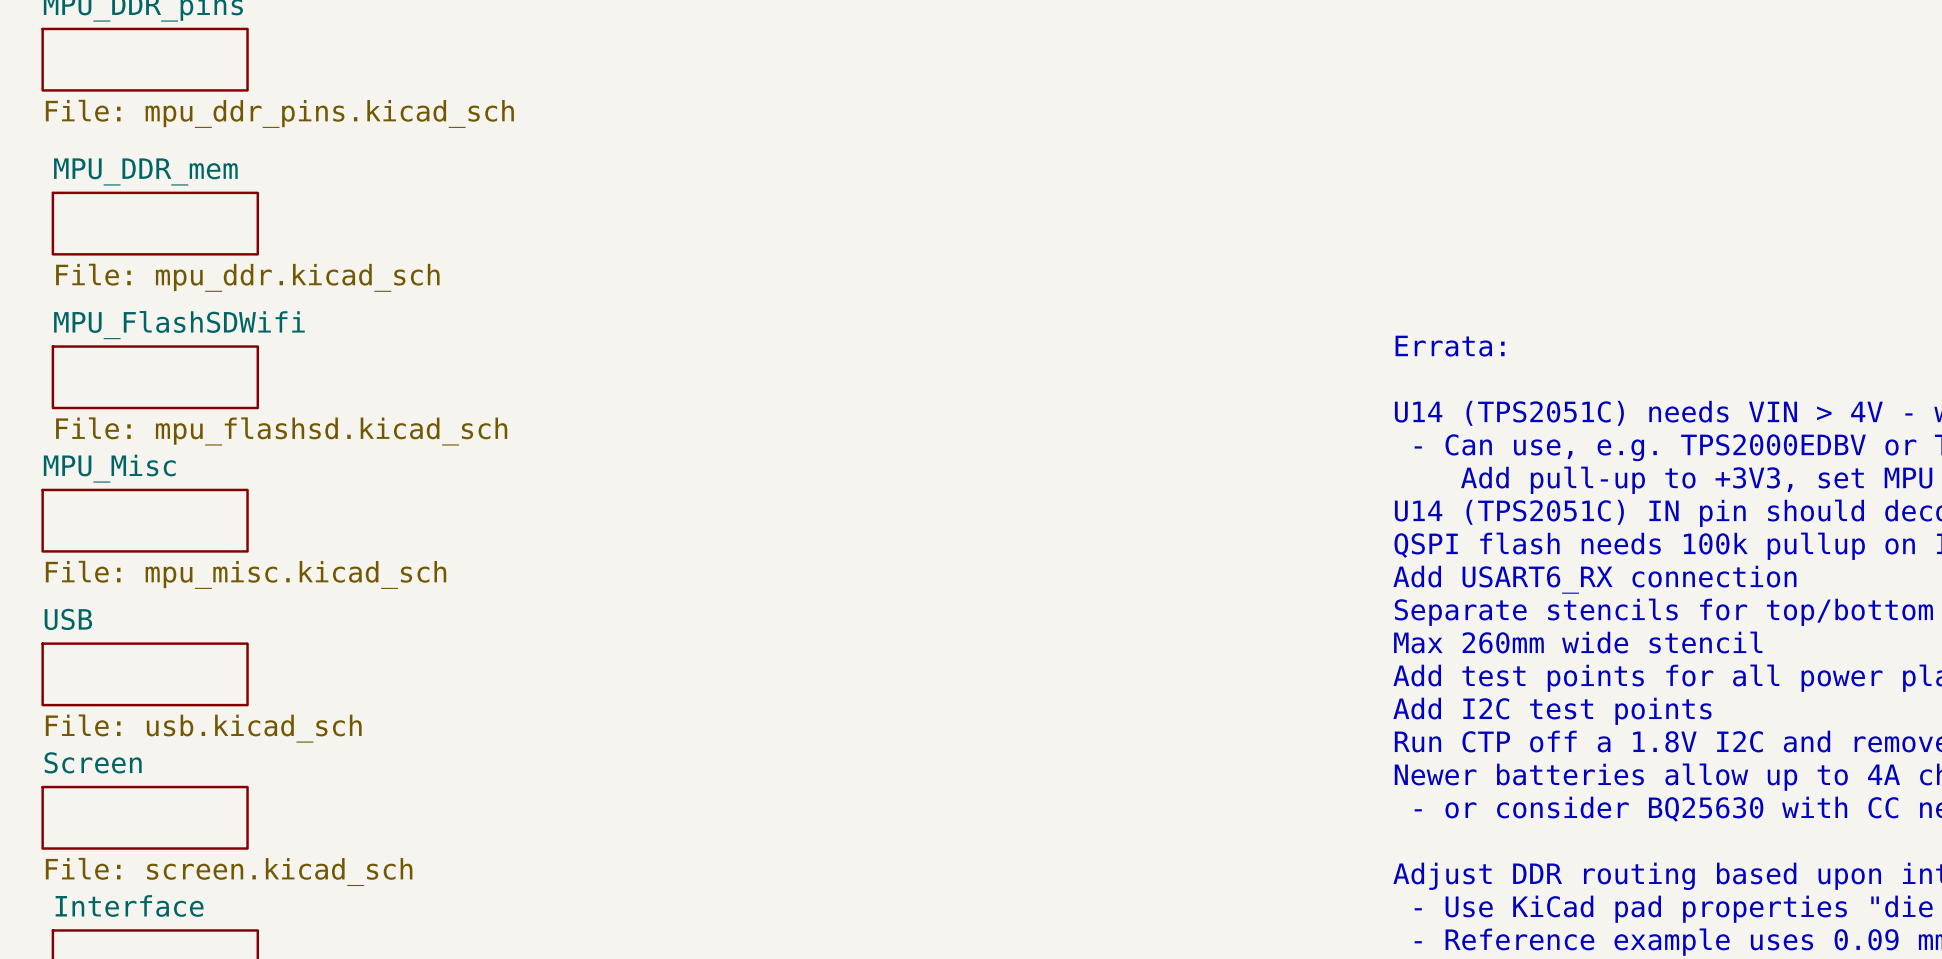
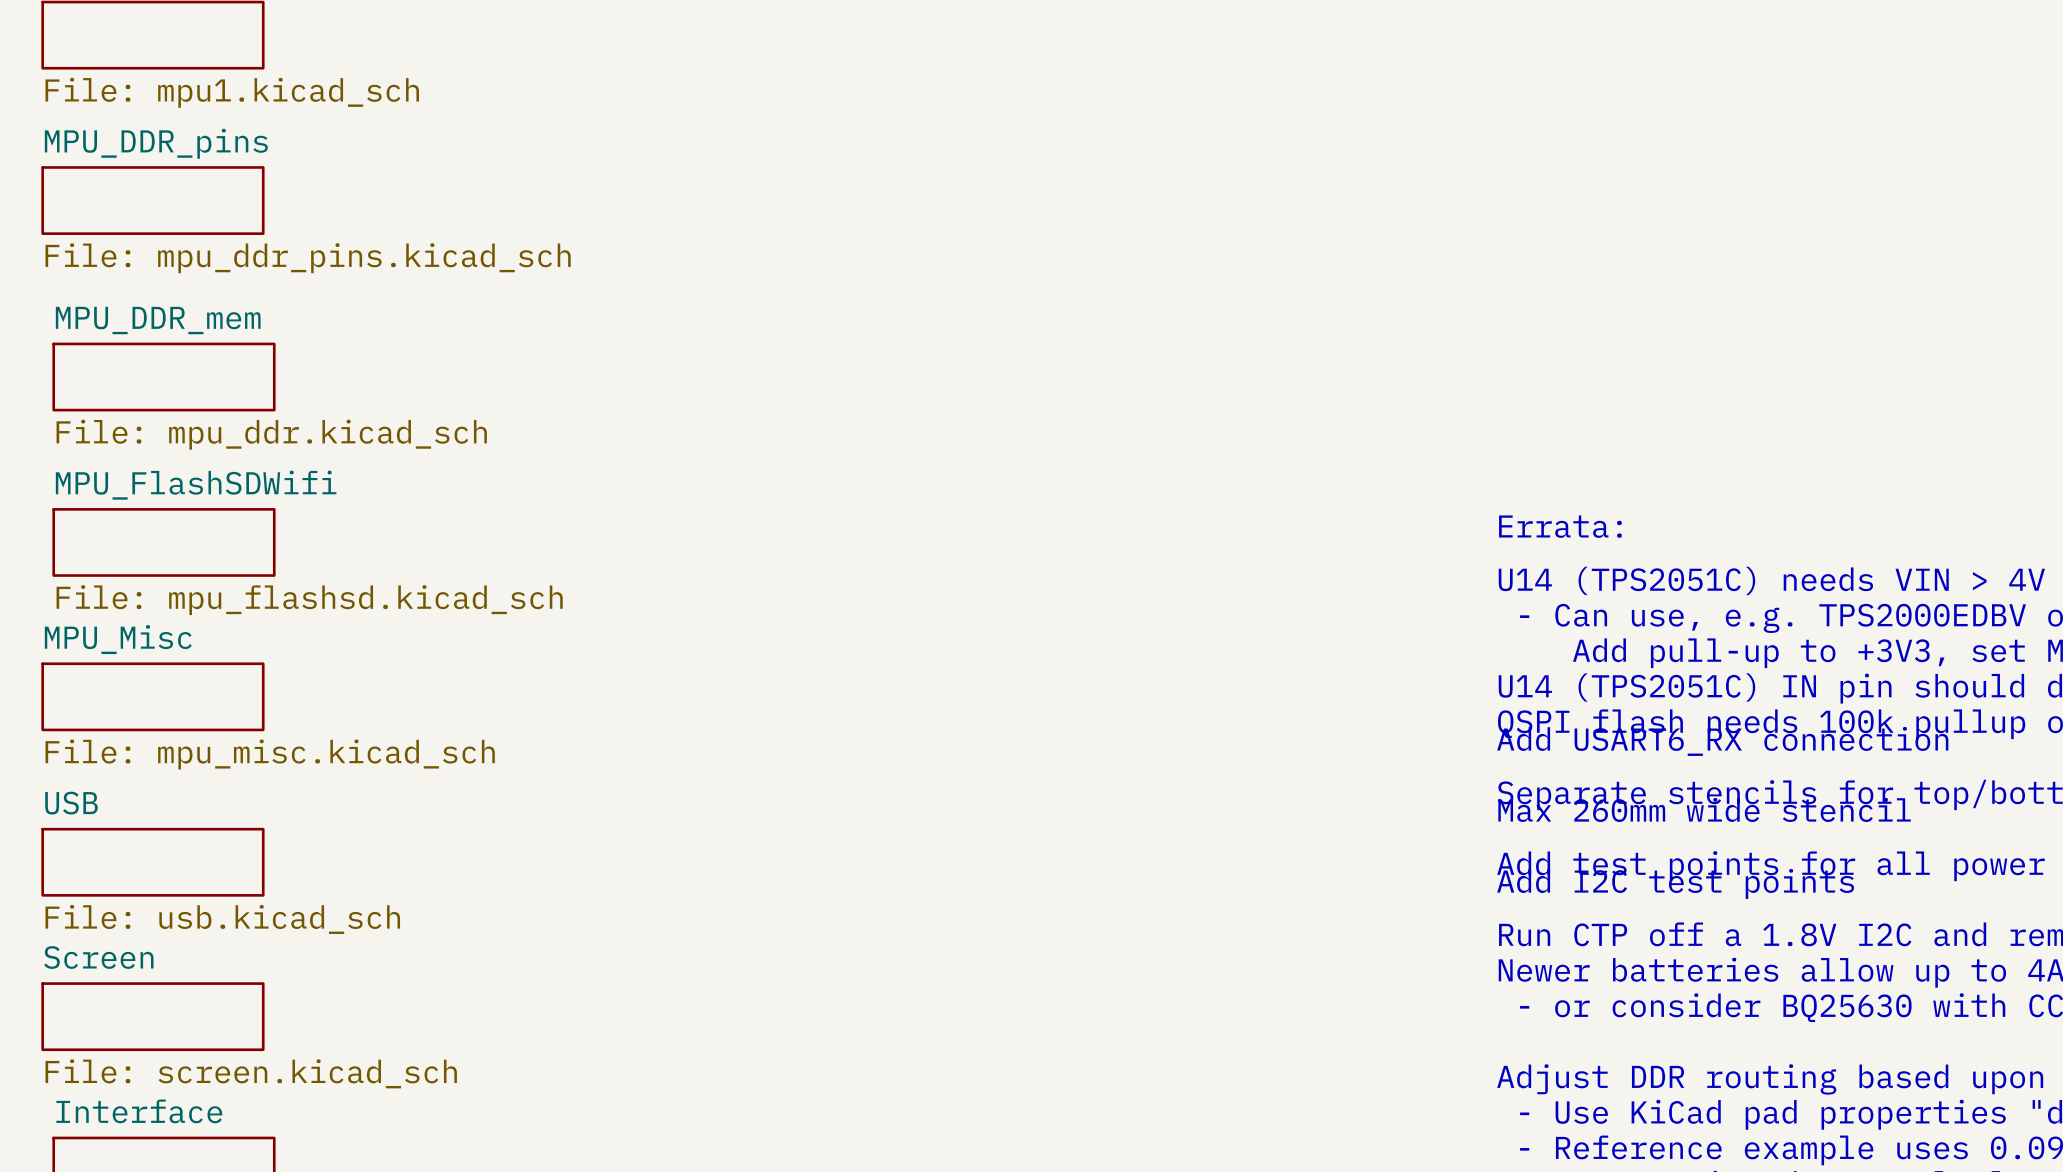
text position: Errata: (1450, 346) -> Errata: (1560, 526)
text position: Add USART6_RX connection (1594, 579) -> Add USART6_RX connection (1722, 741)
text position: Max 260mm wide stencil (1578, 642) -> Max 260mm wide stencil (1704, 809)
text position: Add I2C test points (1552, 711) -> Add I2C test points (1675, 883)

